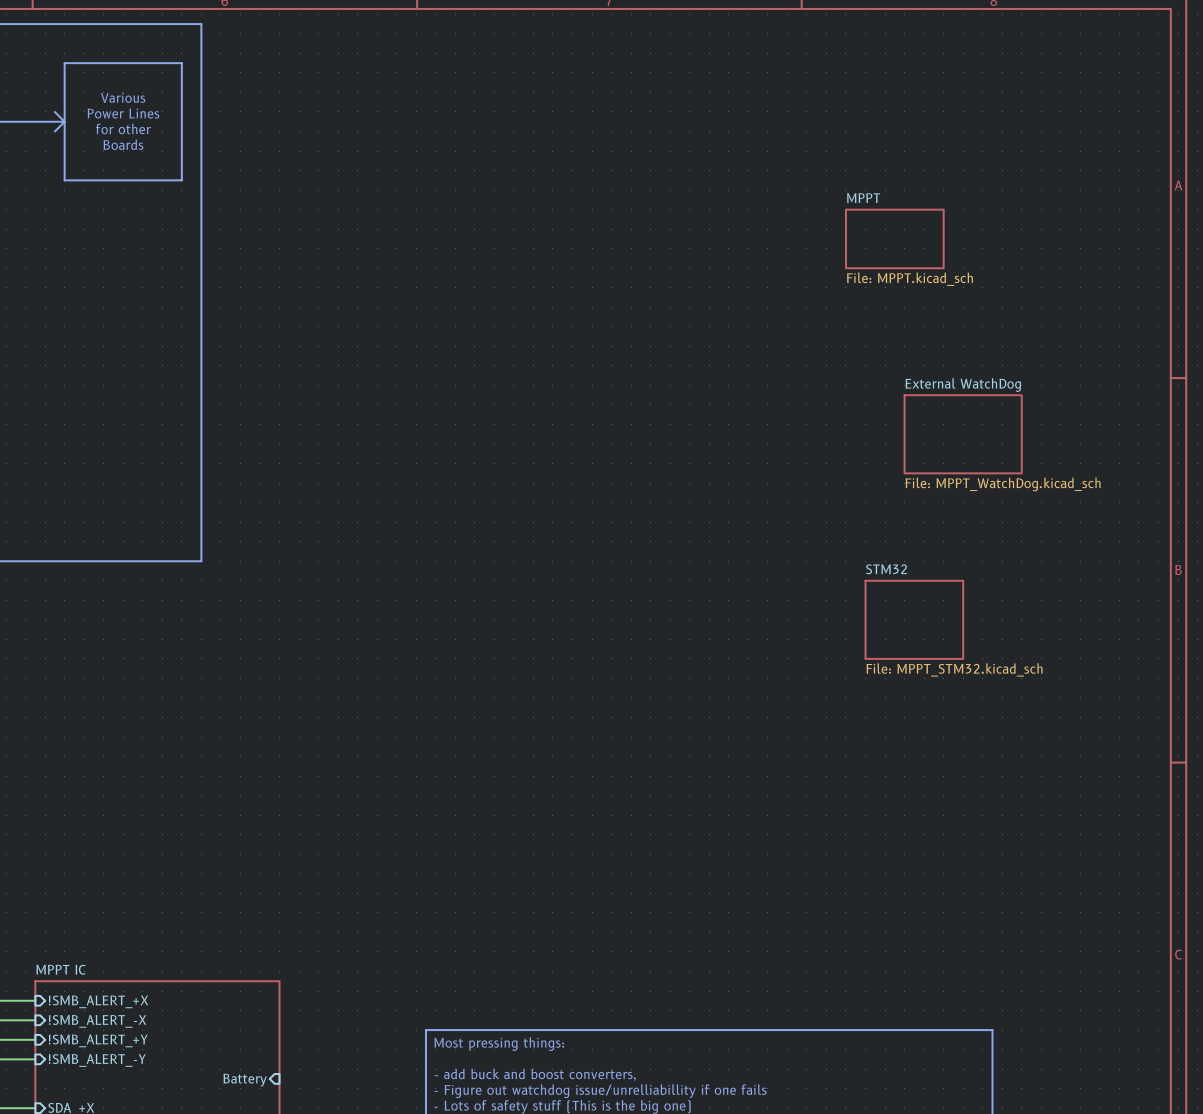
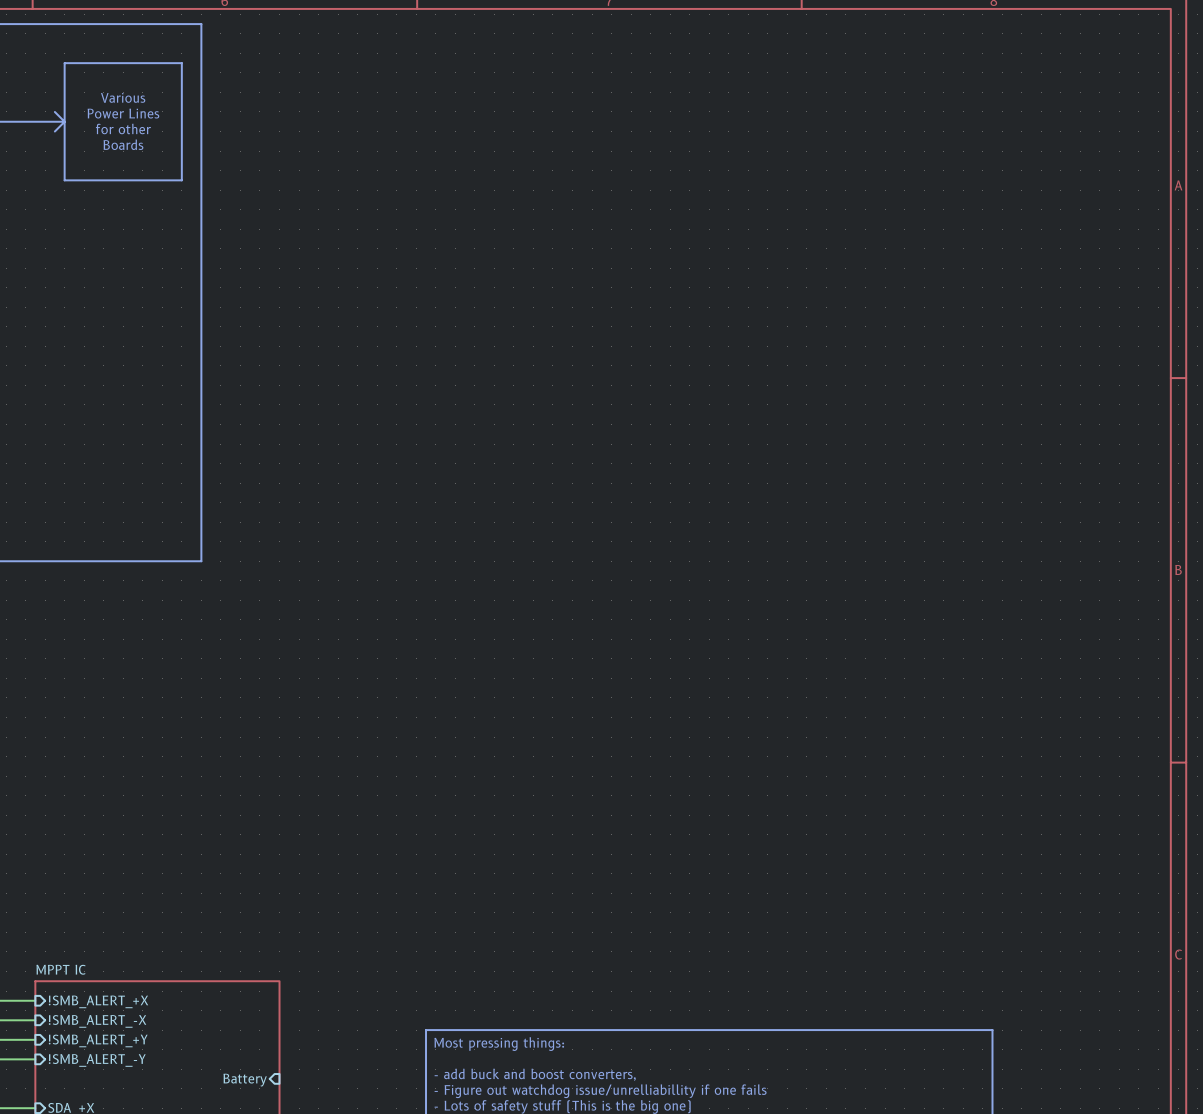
sheet MPPT: File: MPPT.kicad_sch (894, 238) -> none
sheet External WatchDog: File: MPPT_WatchDog.kicad_sch (963, 434) -> none
sheet STM32: File: MPPT_STM32.kicad_sch (914, 619) -> none

